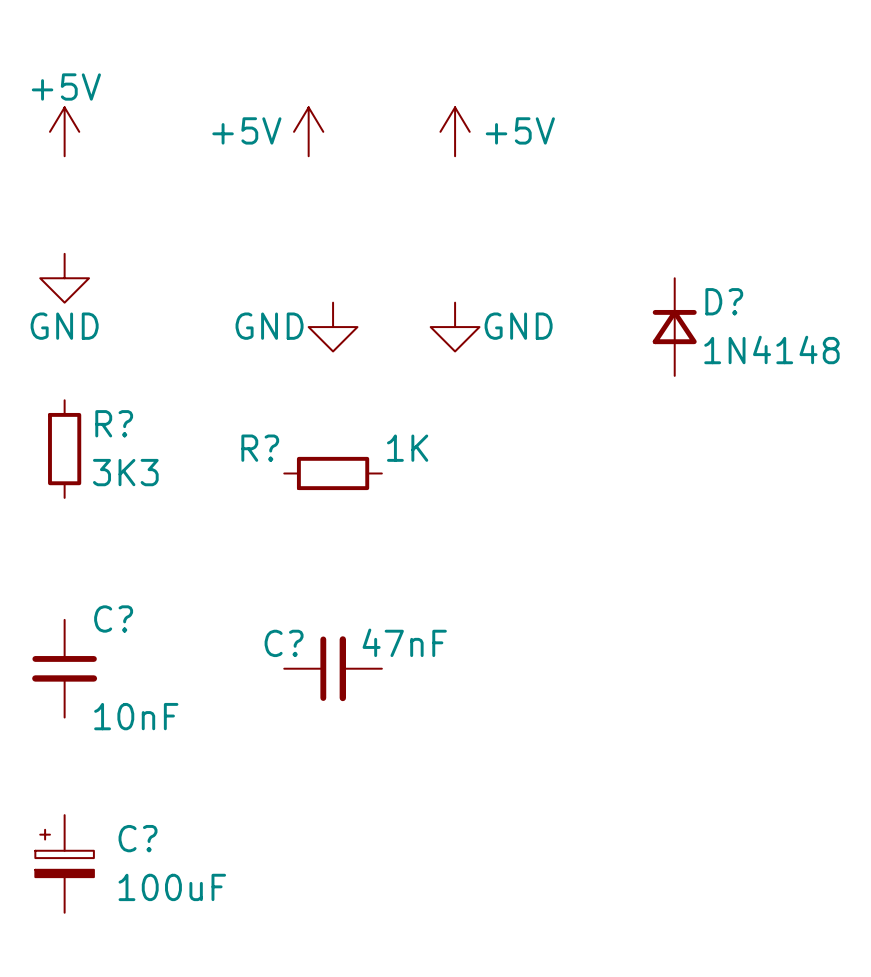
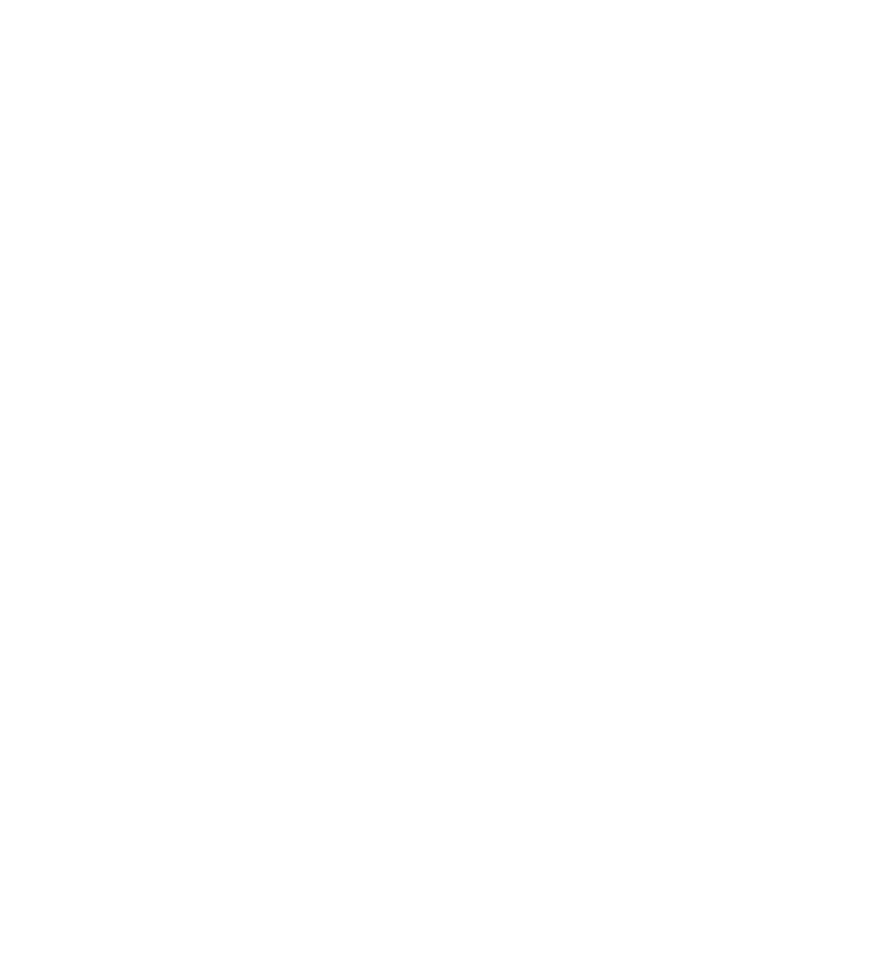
power symbol: +5V (64, 131) -> none
power symbol: +5V (308, 131) -> none
power symbol: +5V (455, 131) -> none
power symbol: GND (64, 278) -> none
power symbol: GND (333, 327) -> none
power symbol: GND (455, 327) -> none
D?: 1N4148 (674, 327) -> none
R?: 3K3 (64, 449) -> none
R?: 1K (333, 473) -> none
C?: 10nF (64, 668) -> none
C?: 47nF (333, 668) -> none
C?: 100uF (64, 863) -> none

